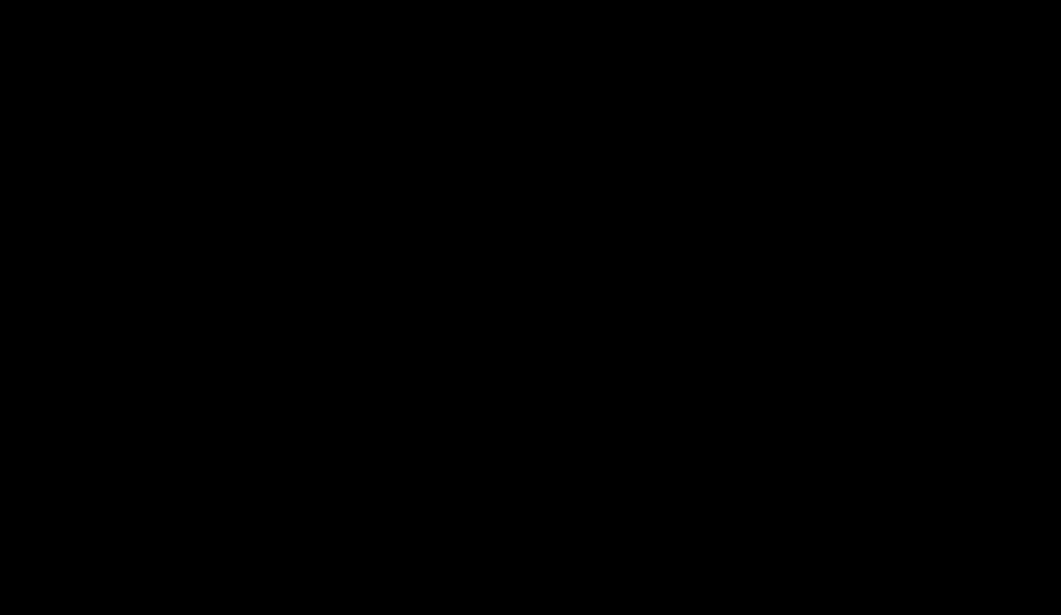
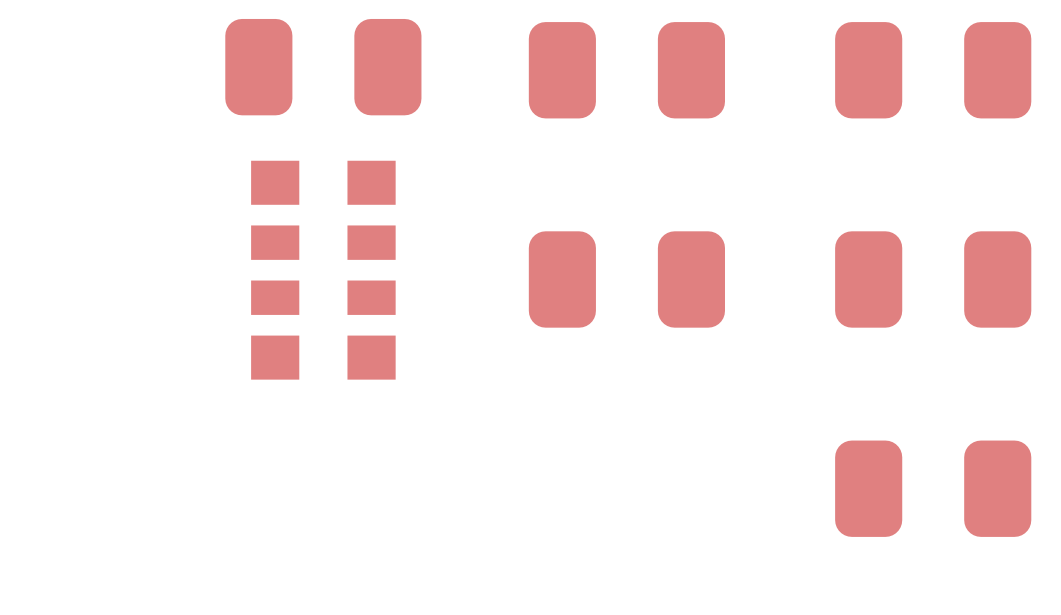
part: none -> (323, 67)
part: none -> (626, 70)
part: none -> (933, 70)
part: none -> (323, 270)
part: none -> (626, 279)
part: none -> (933, 279)
part: none -> (933, 488)

